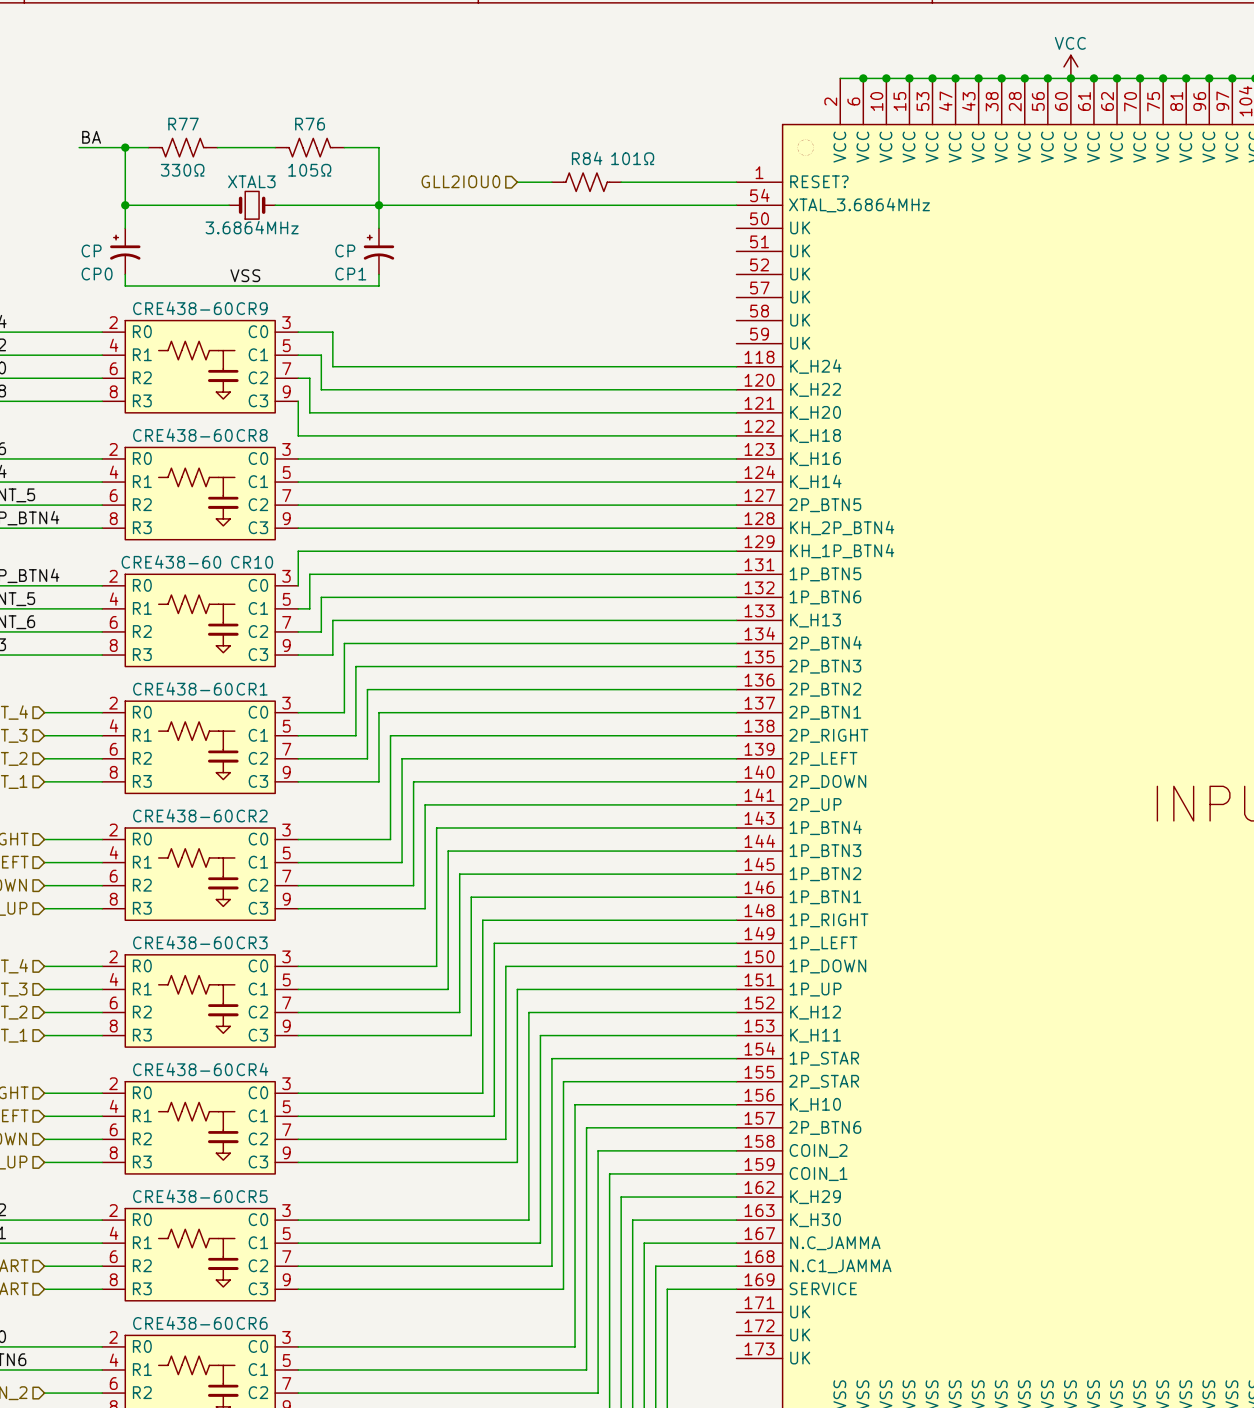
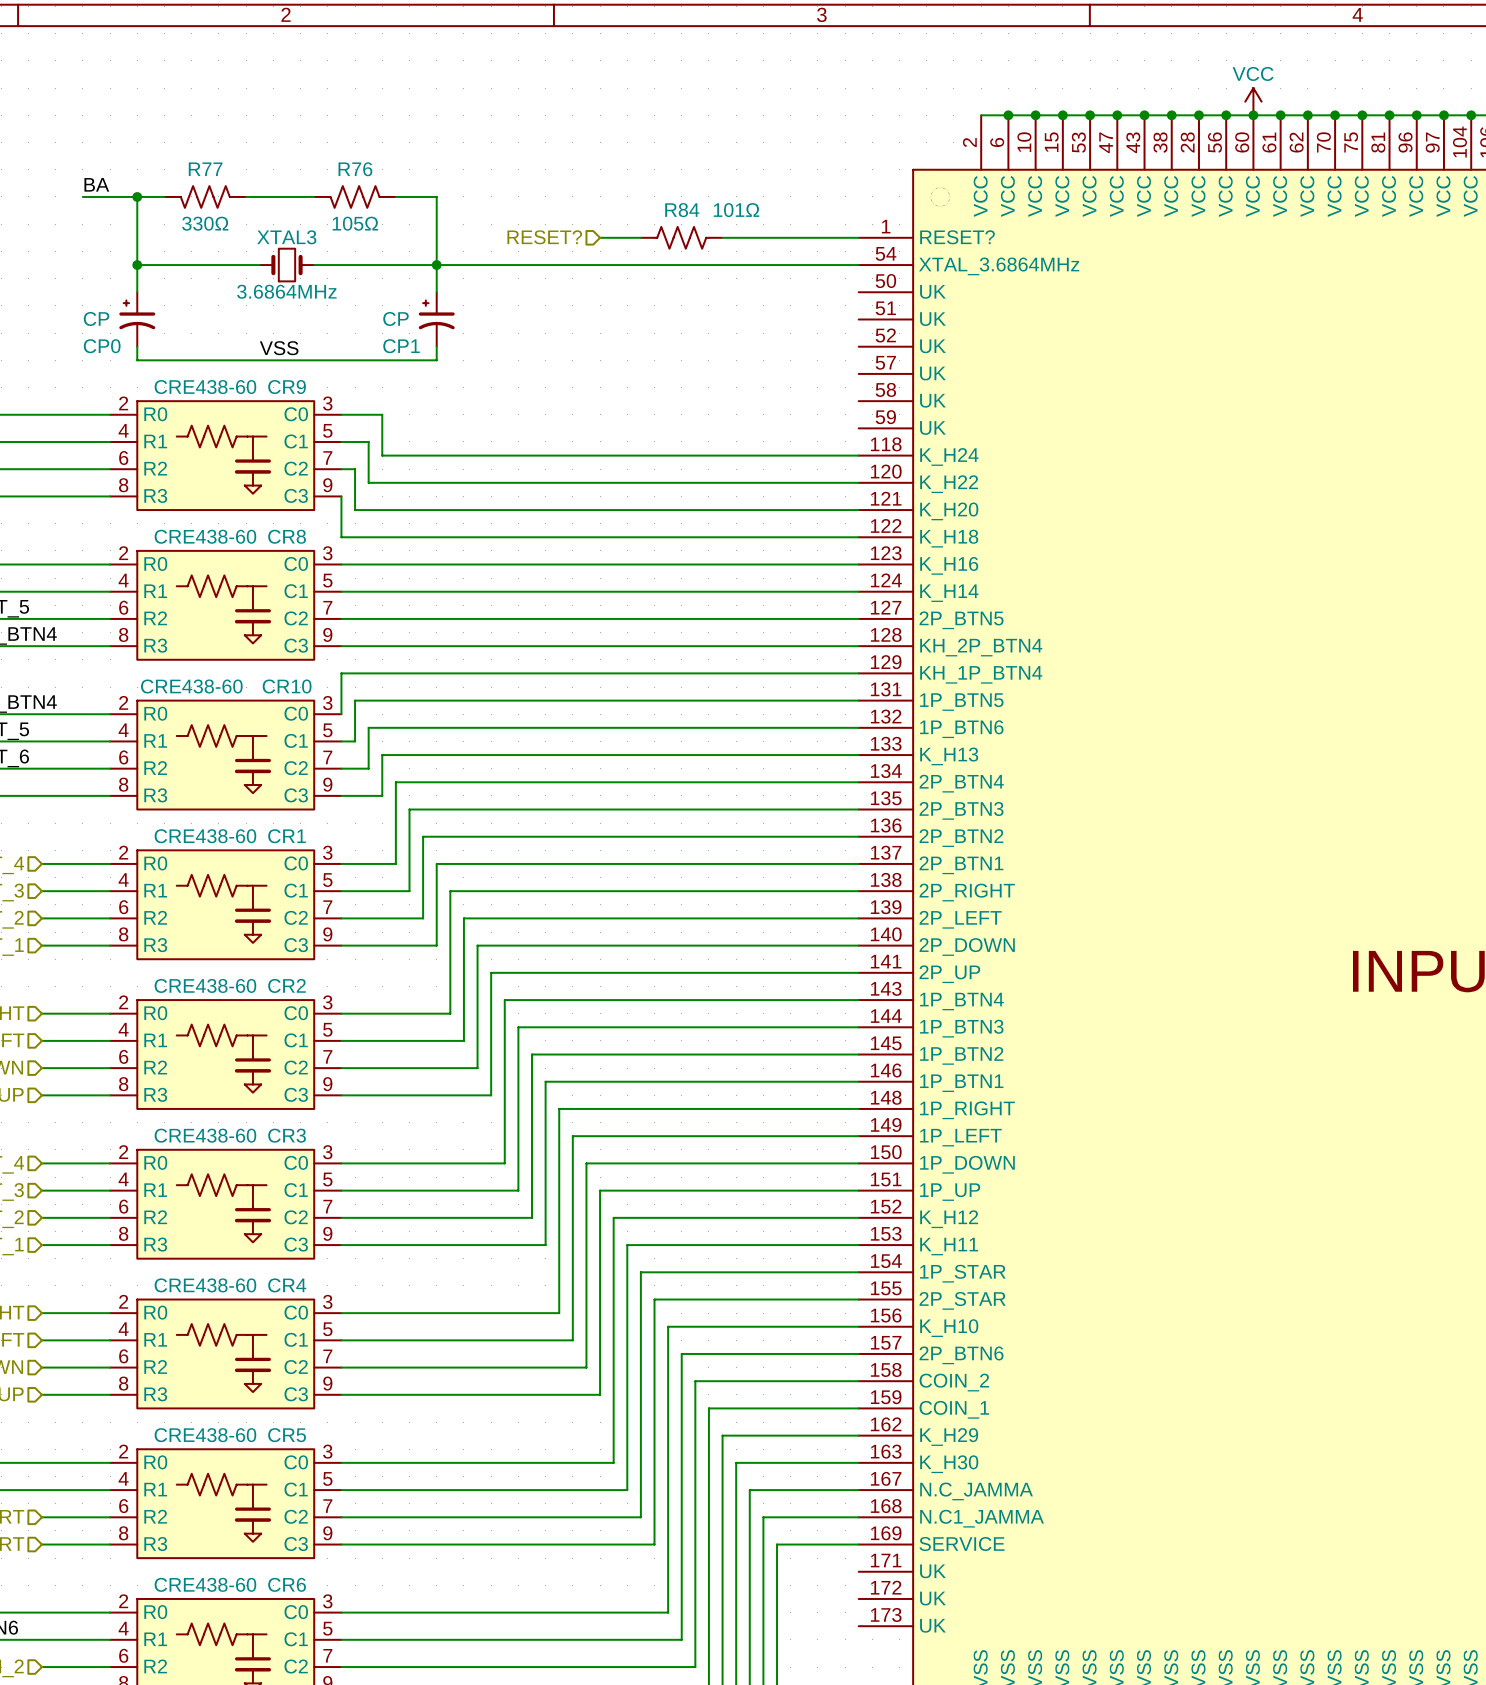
hierarchical label: GLL2IOU0 (460, 181) -> RESET? (544, 237)

